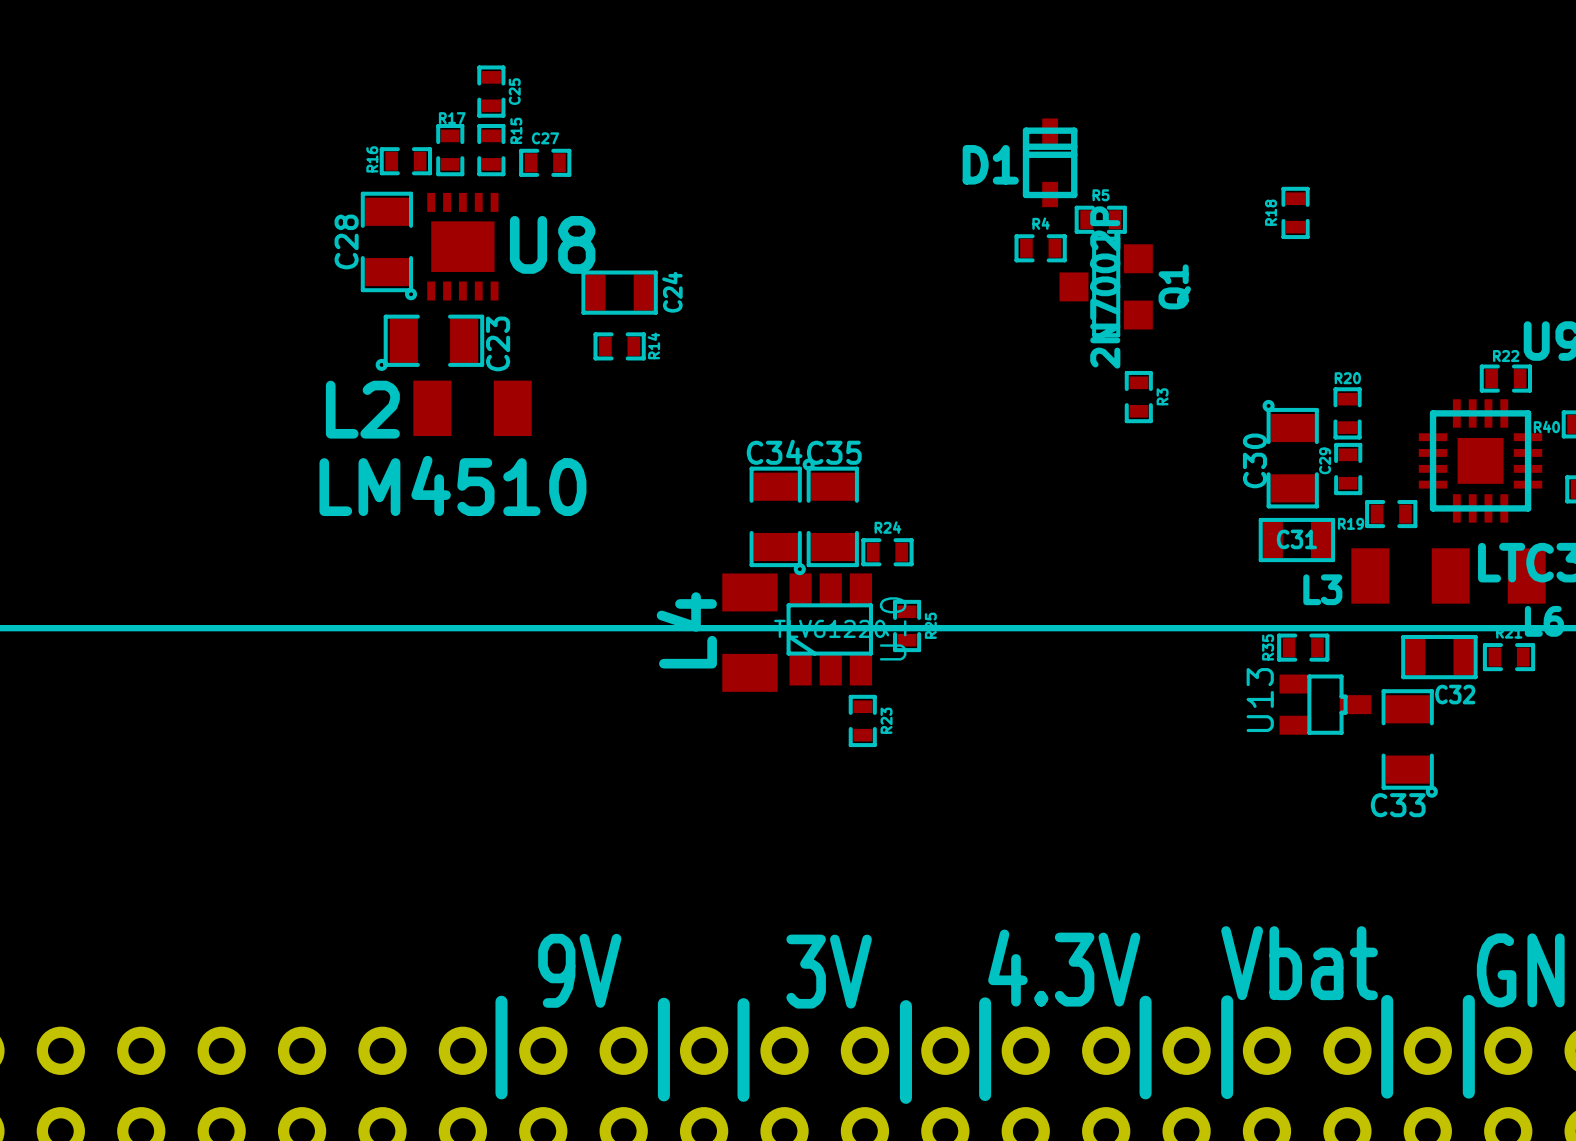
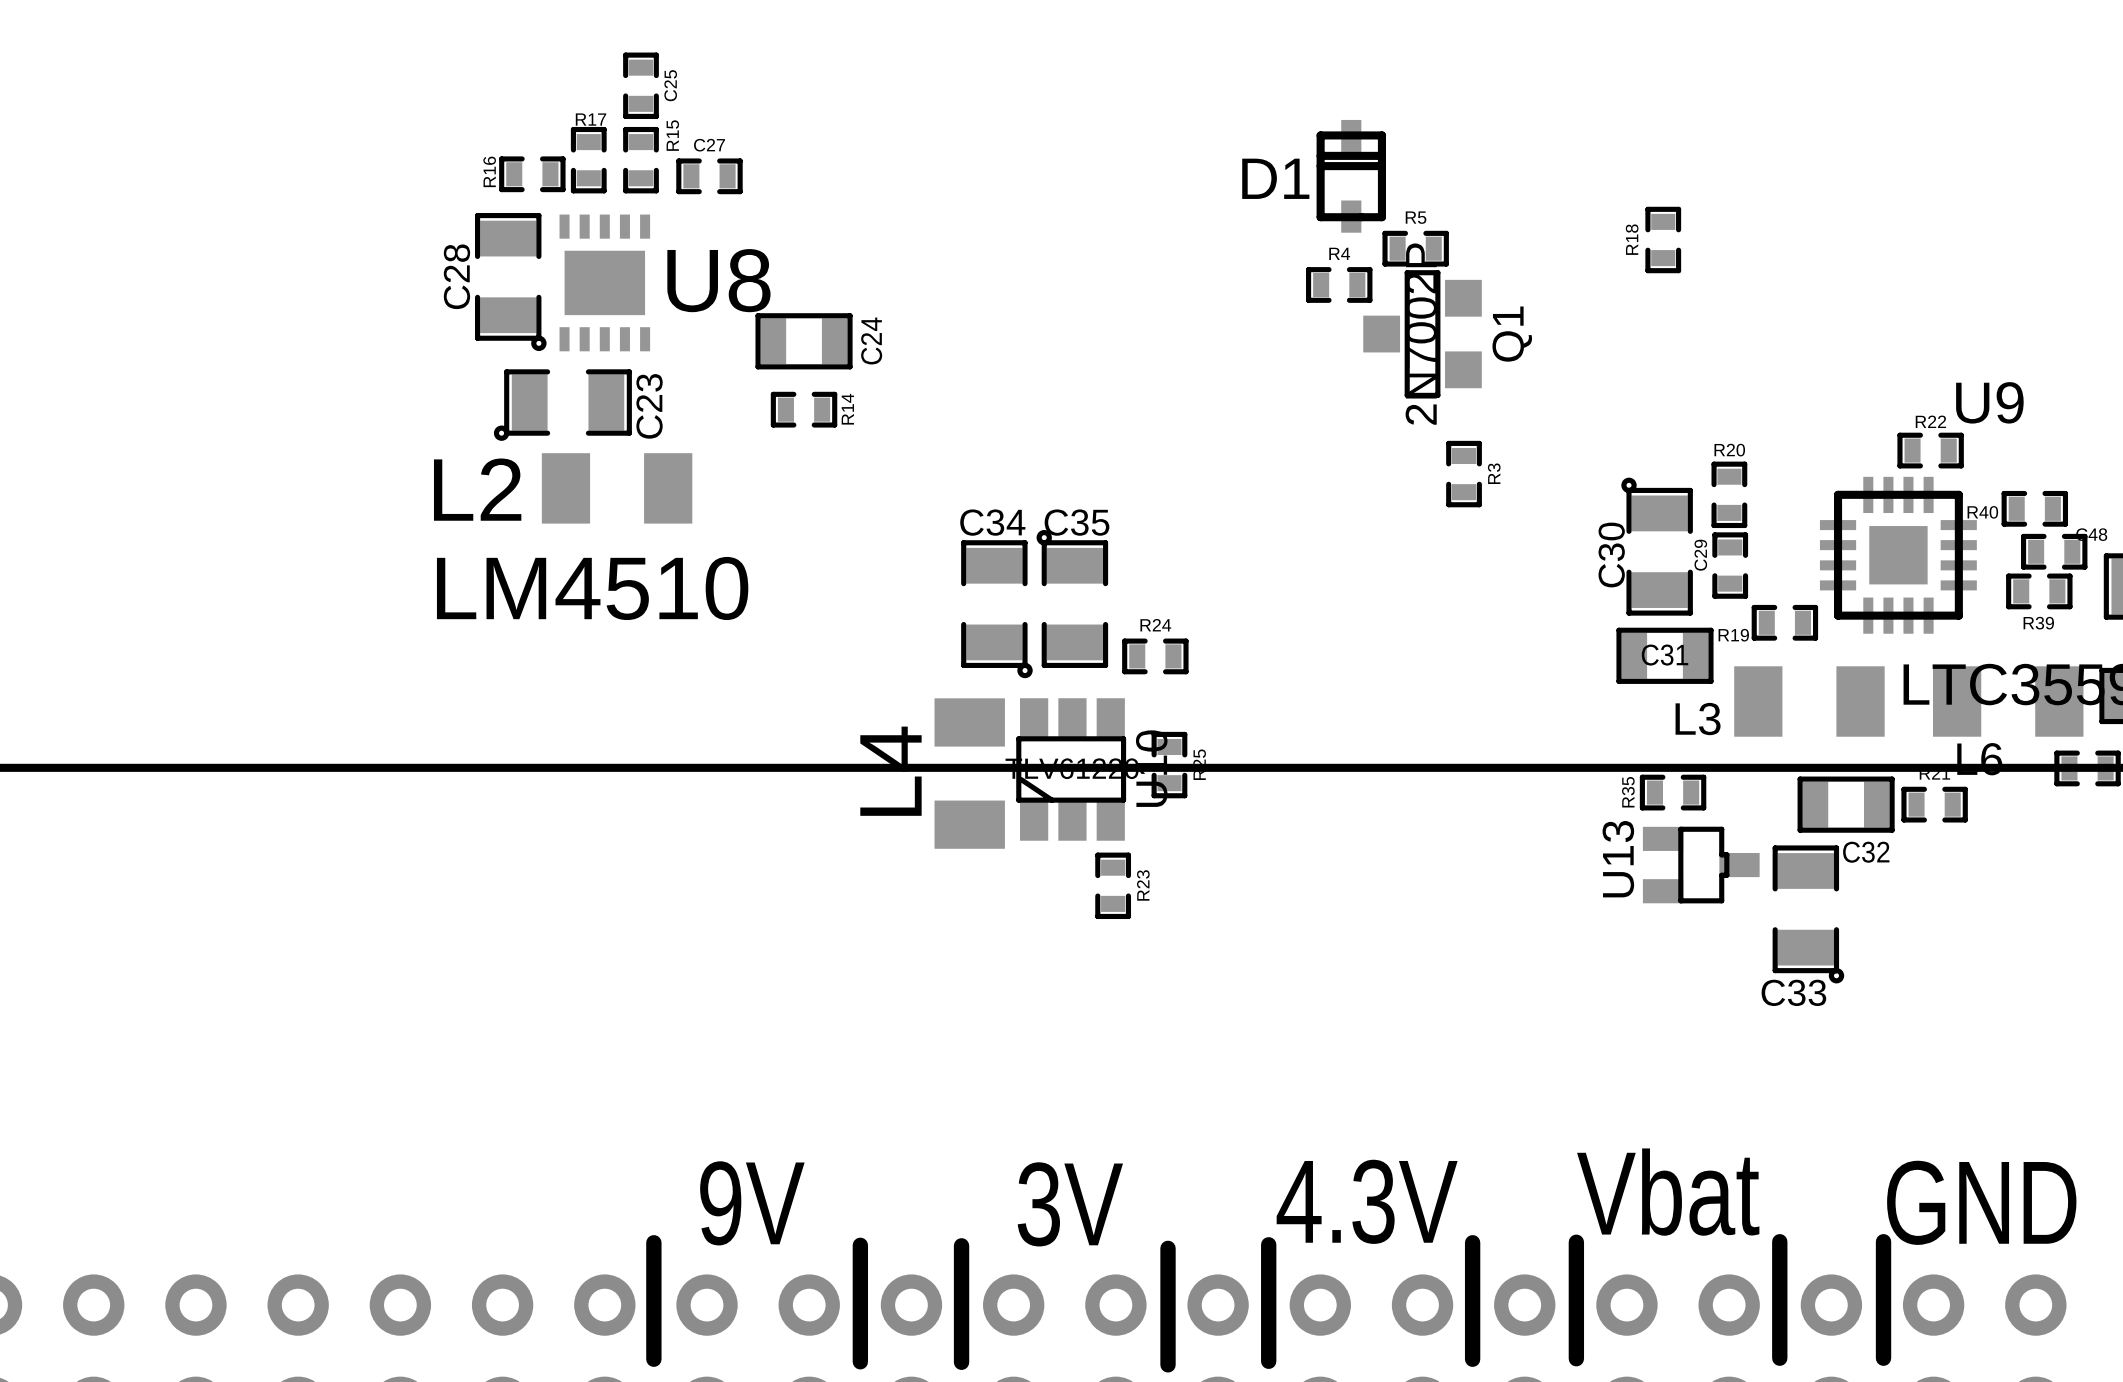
C35 position: (830, 512) -> (1072, 598)
C34 position: (777, 520) -> (996, 609)
R24 position: (887, 552) -> (1155, 656)

